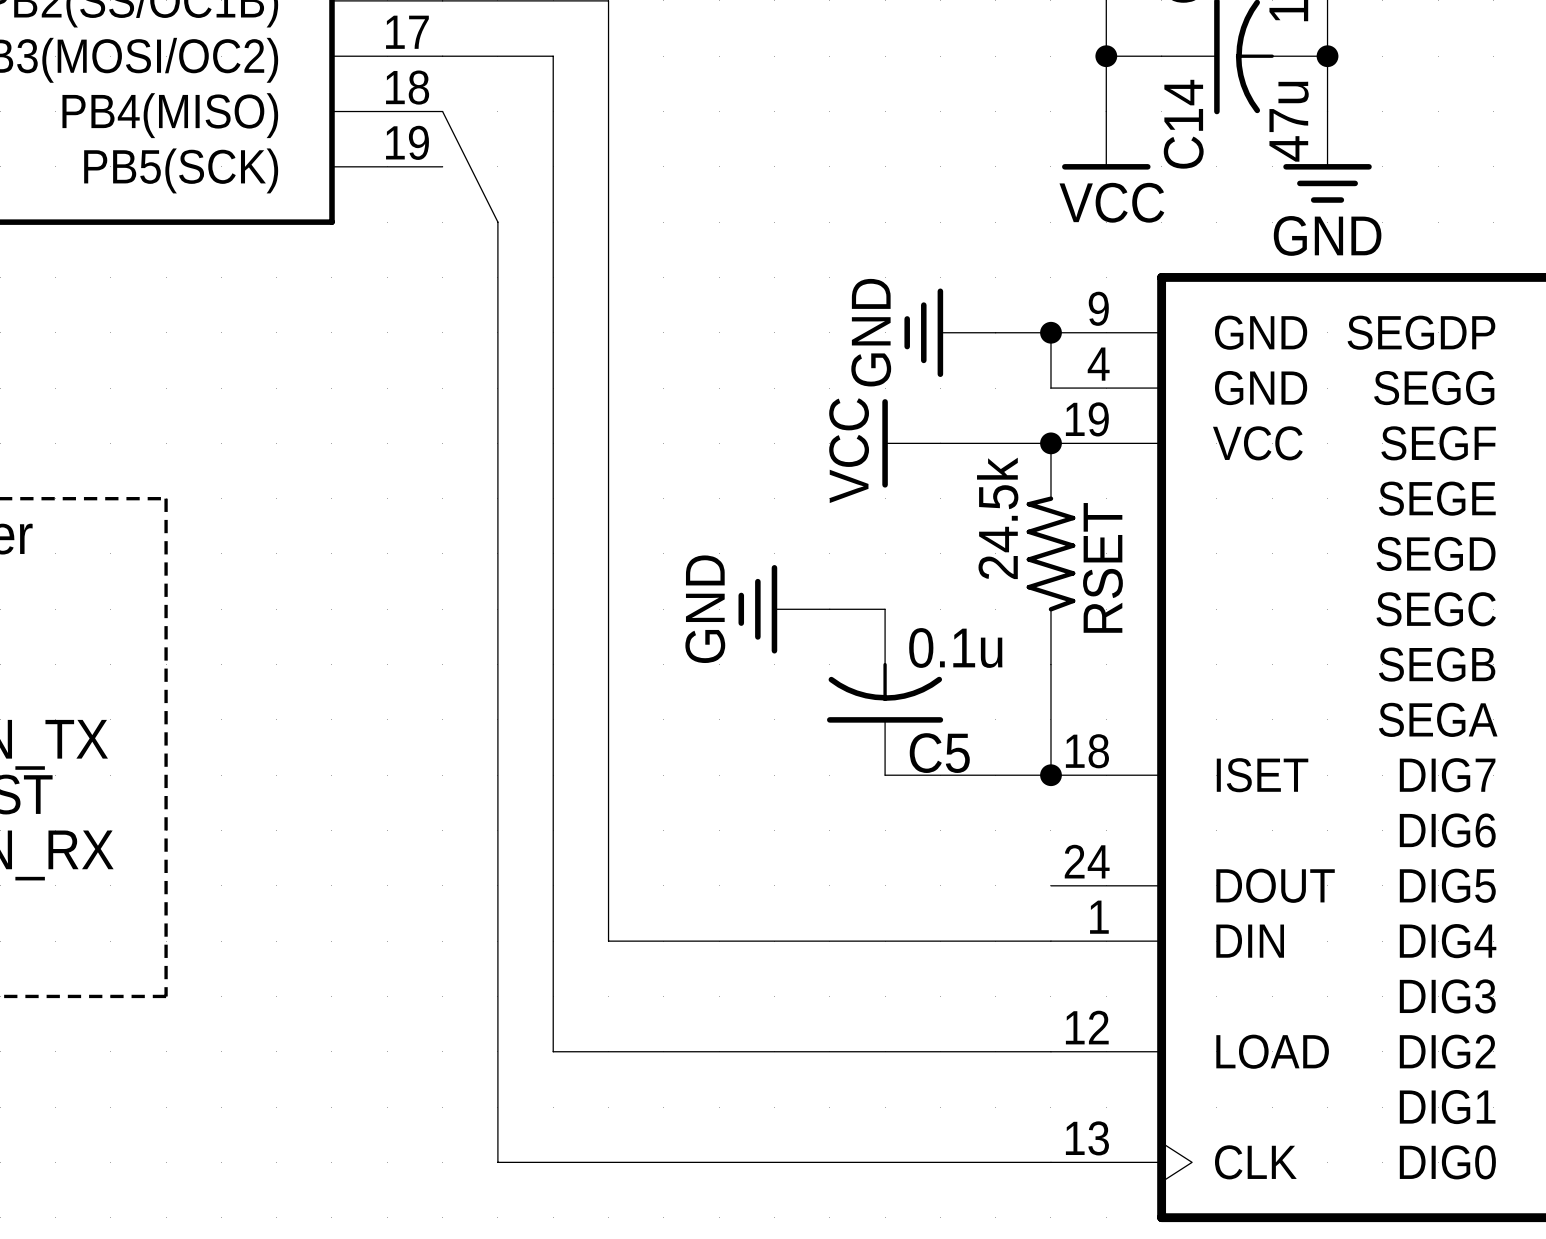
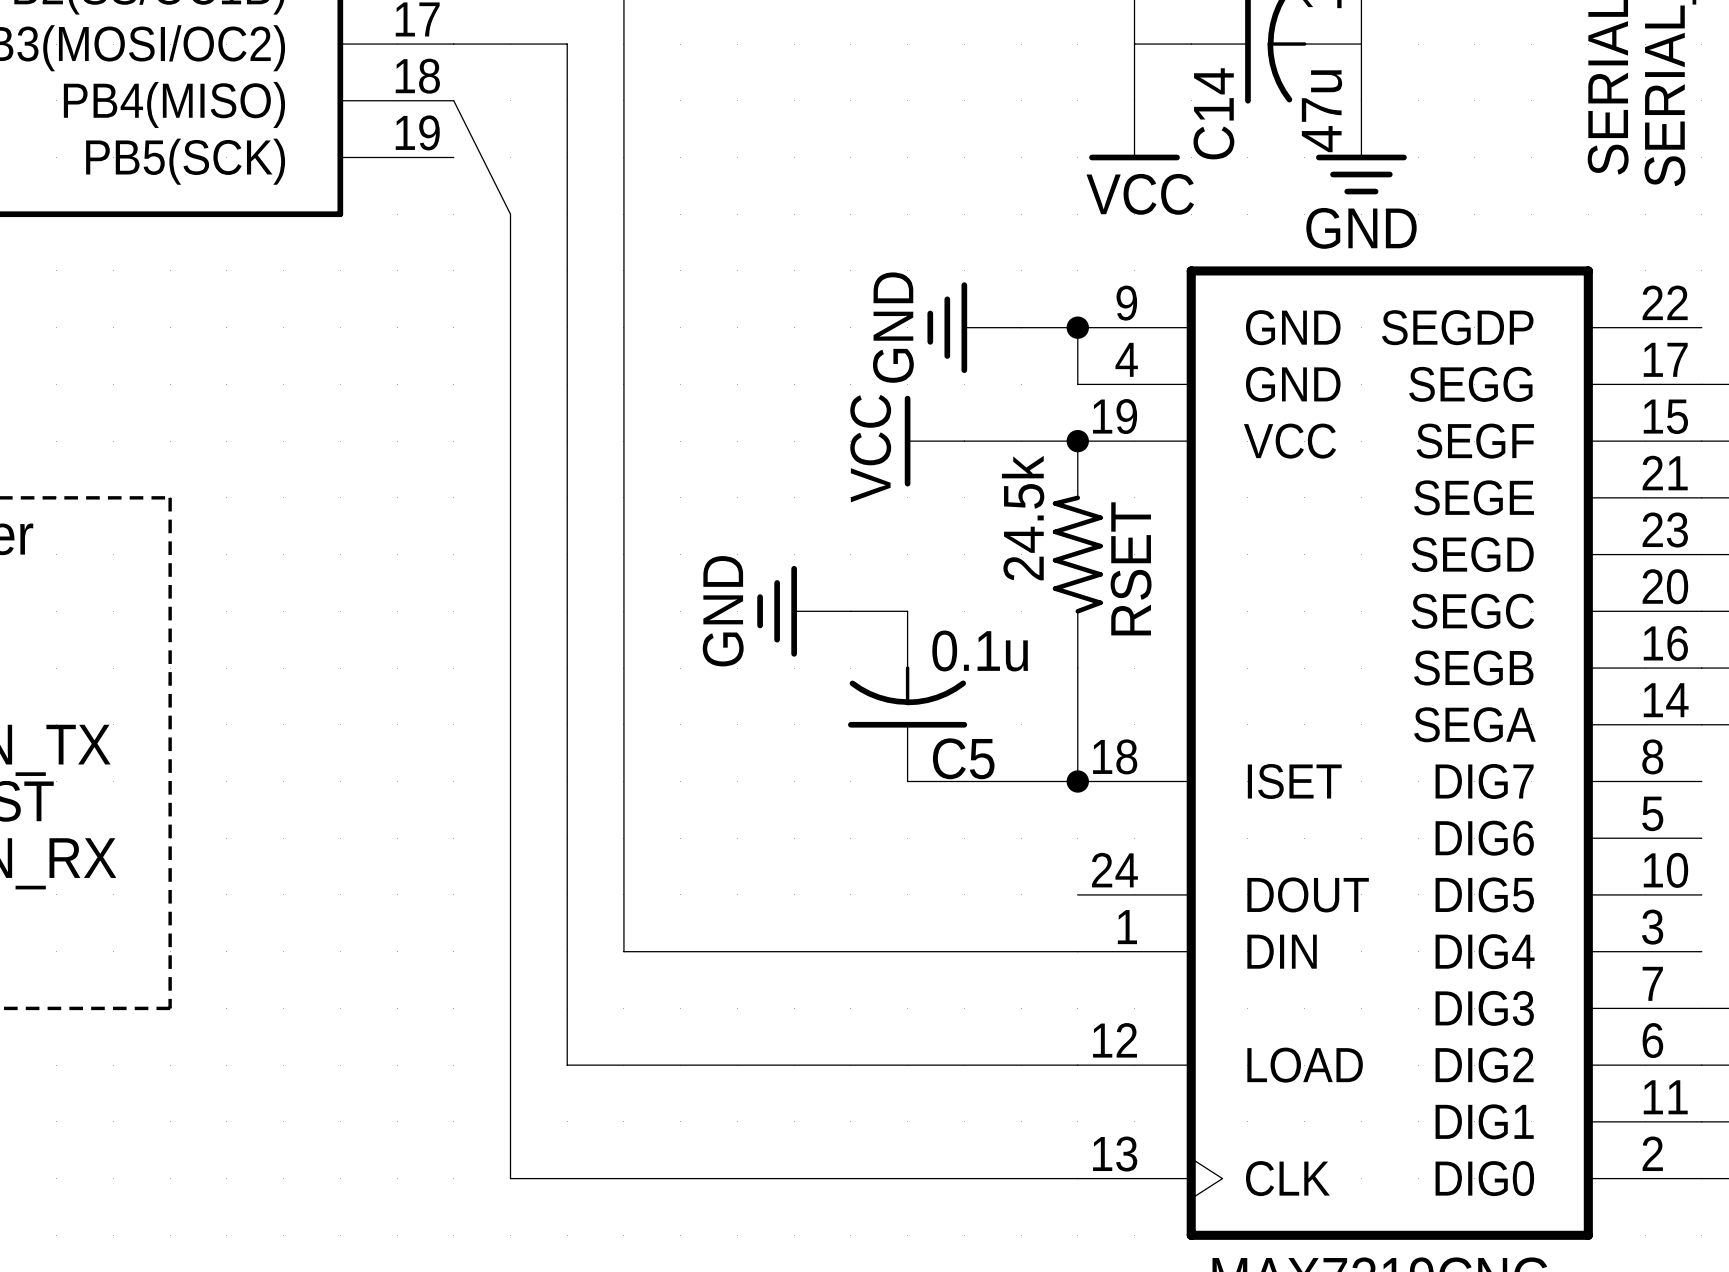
junction: (1106, 56) -> none
junction: (1327, 56) -> none

